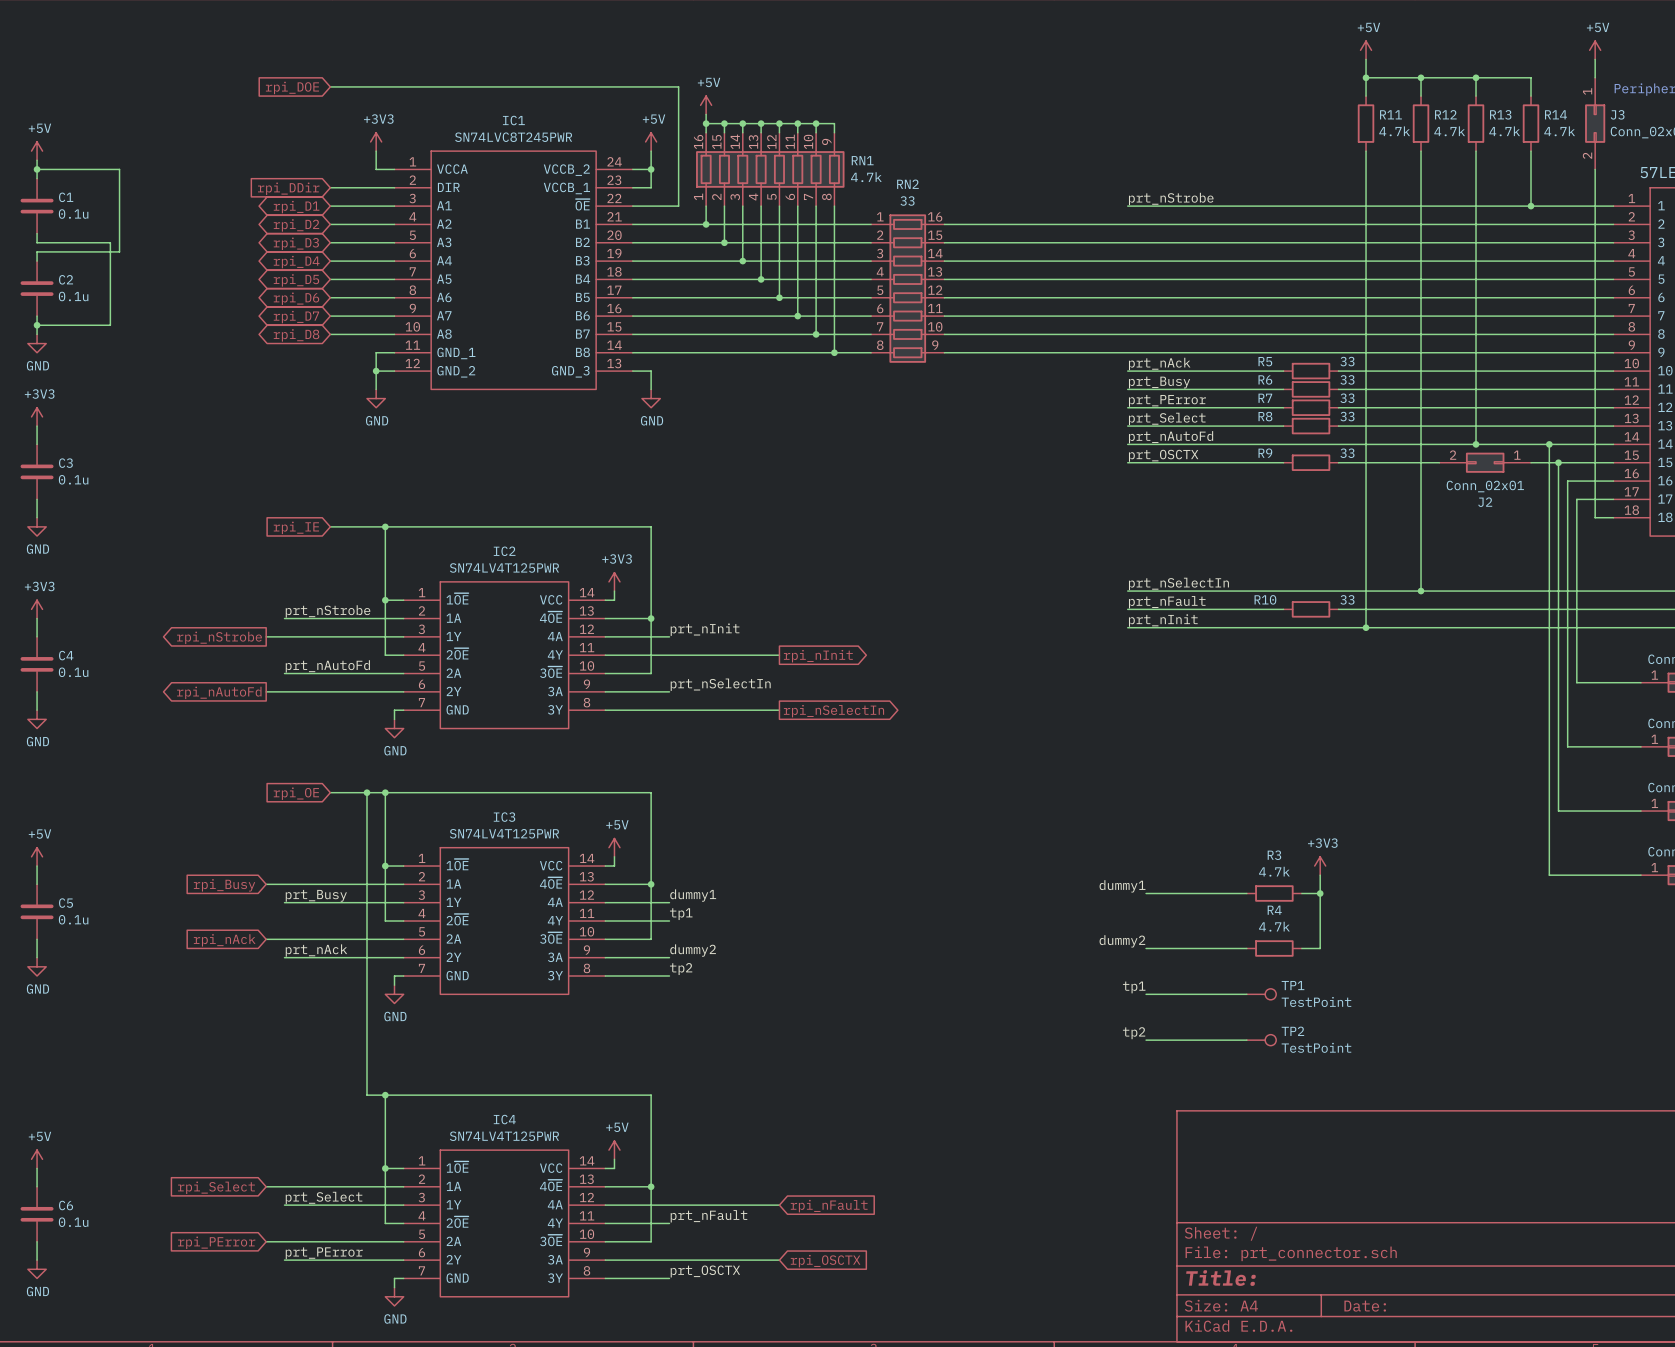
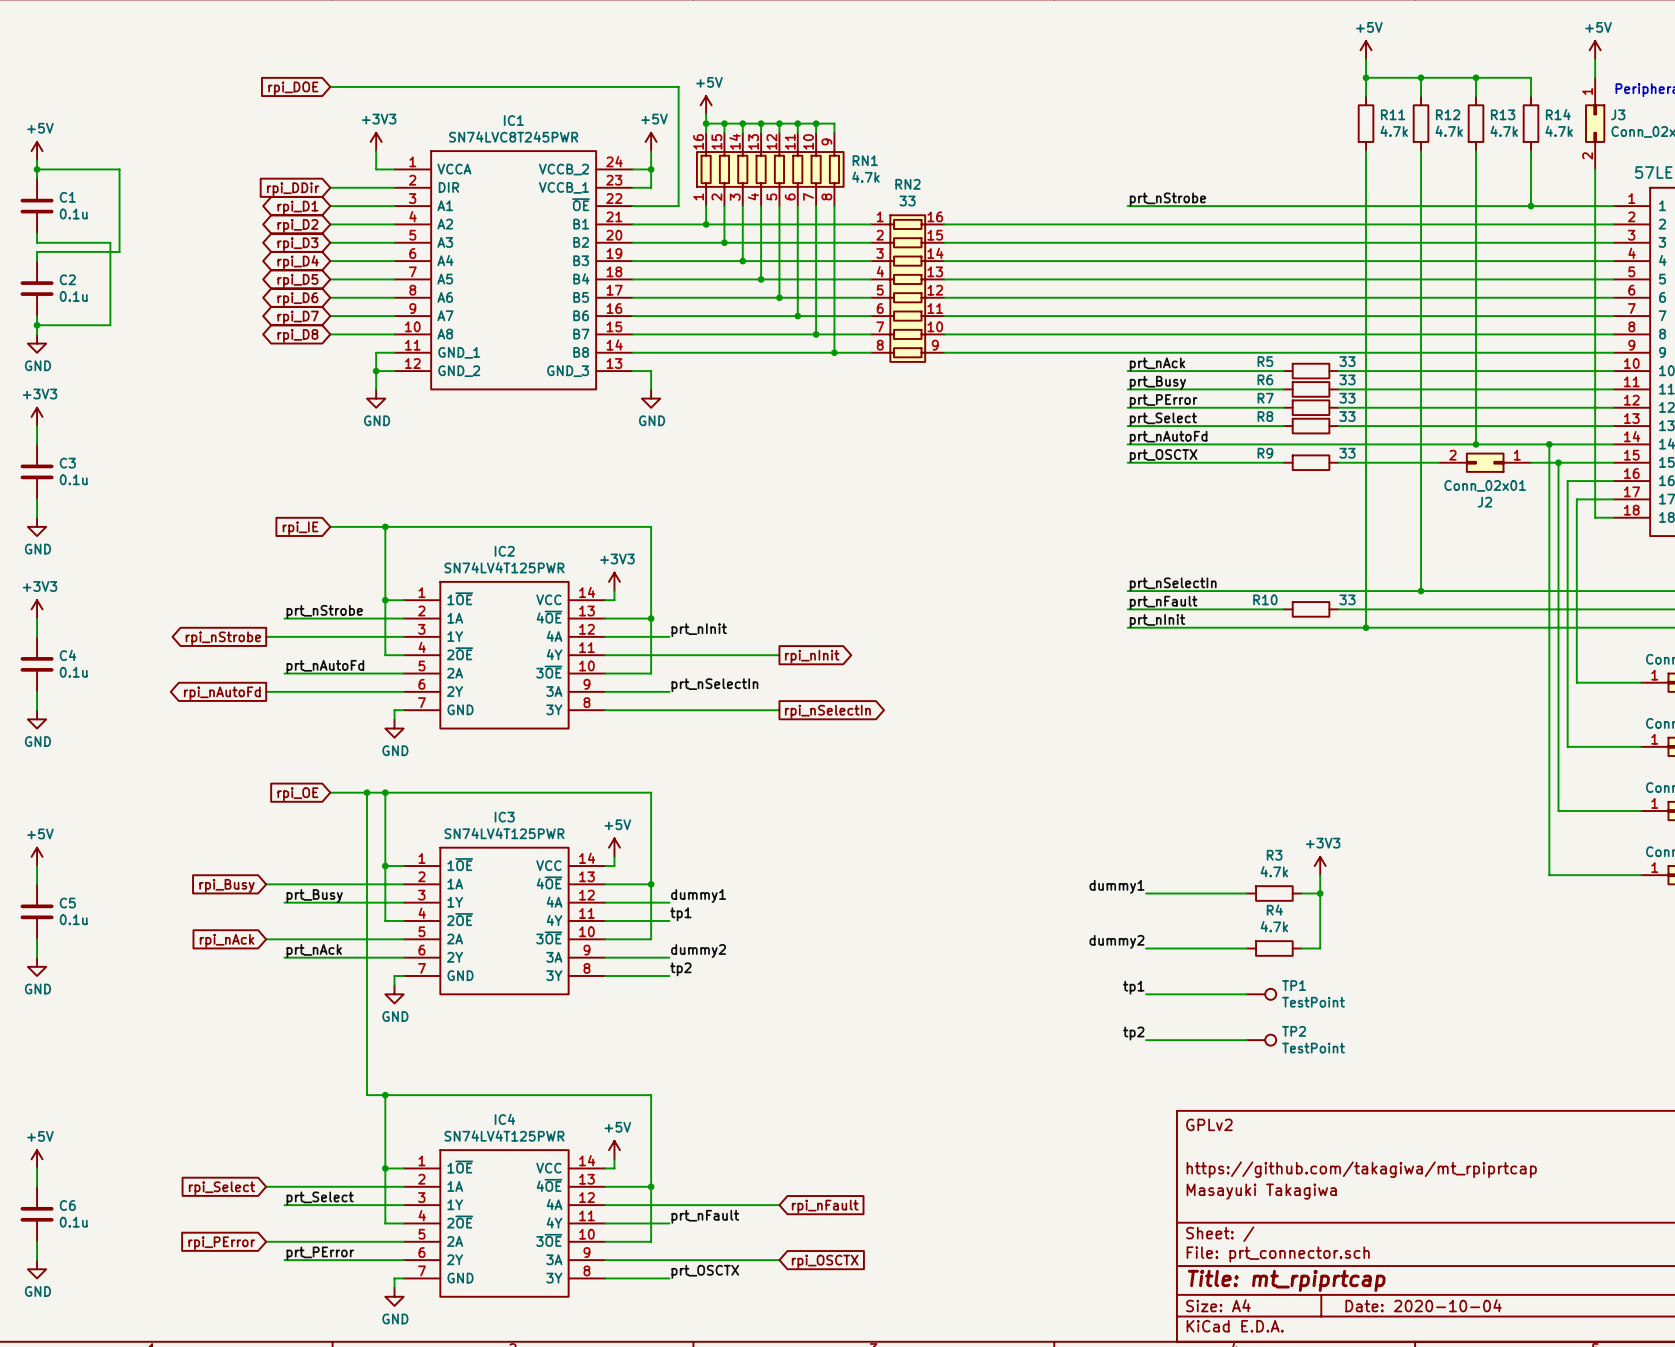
title block: none -> GPLv2 (1209, 1124)
title block: none -> https://github.com/takagiwa/mt_rpiprtcap (1361, 1169)
title block: none -> Masayuki Takagiwa (1261, 1191)
title block: Title: (1220, 1278) -> Title: mt_rpiprtcap (1286, 1280)
title block: Date: (1365, 1306) -> Date: 2020-10-04 (1423, 1305)

